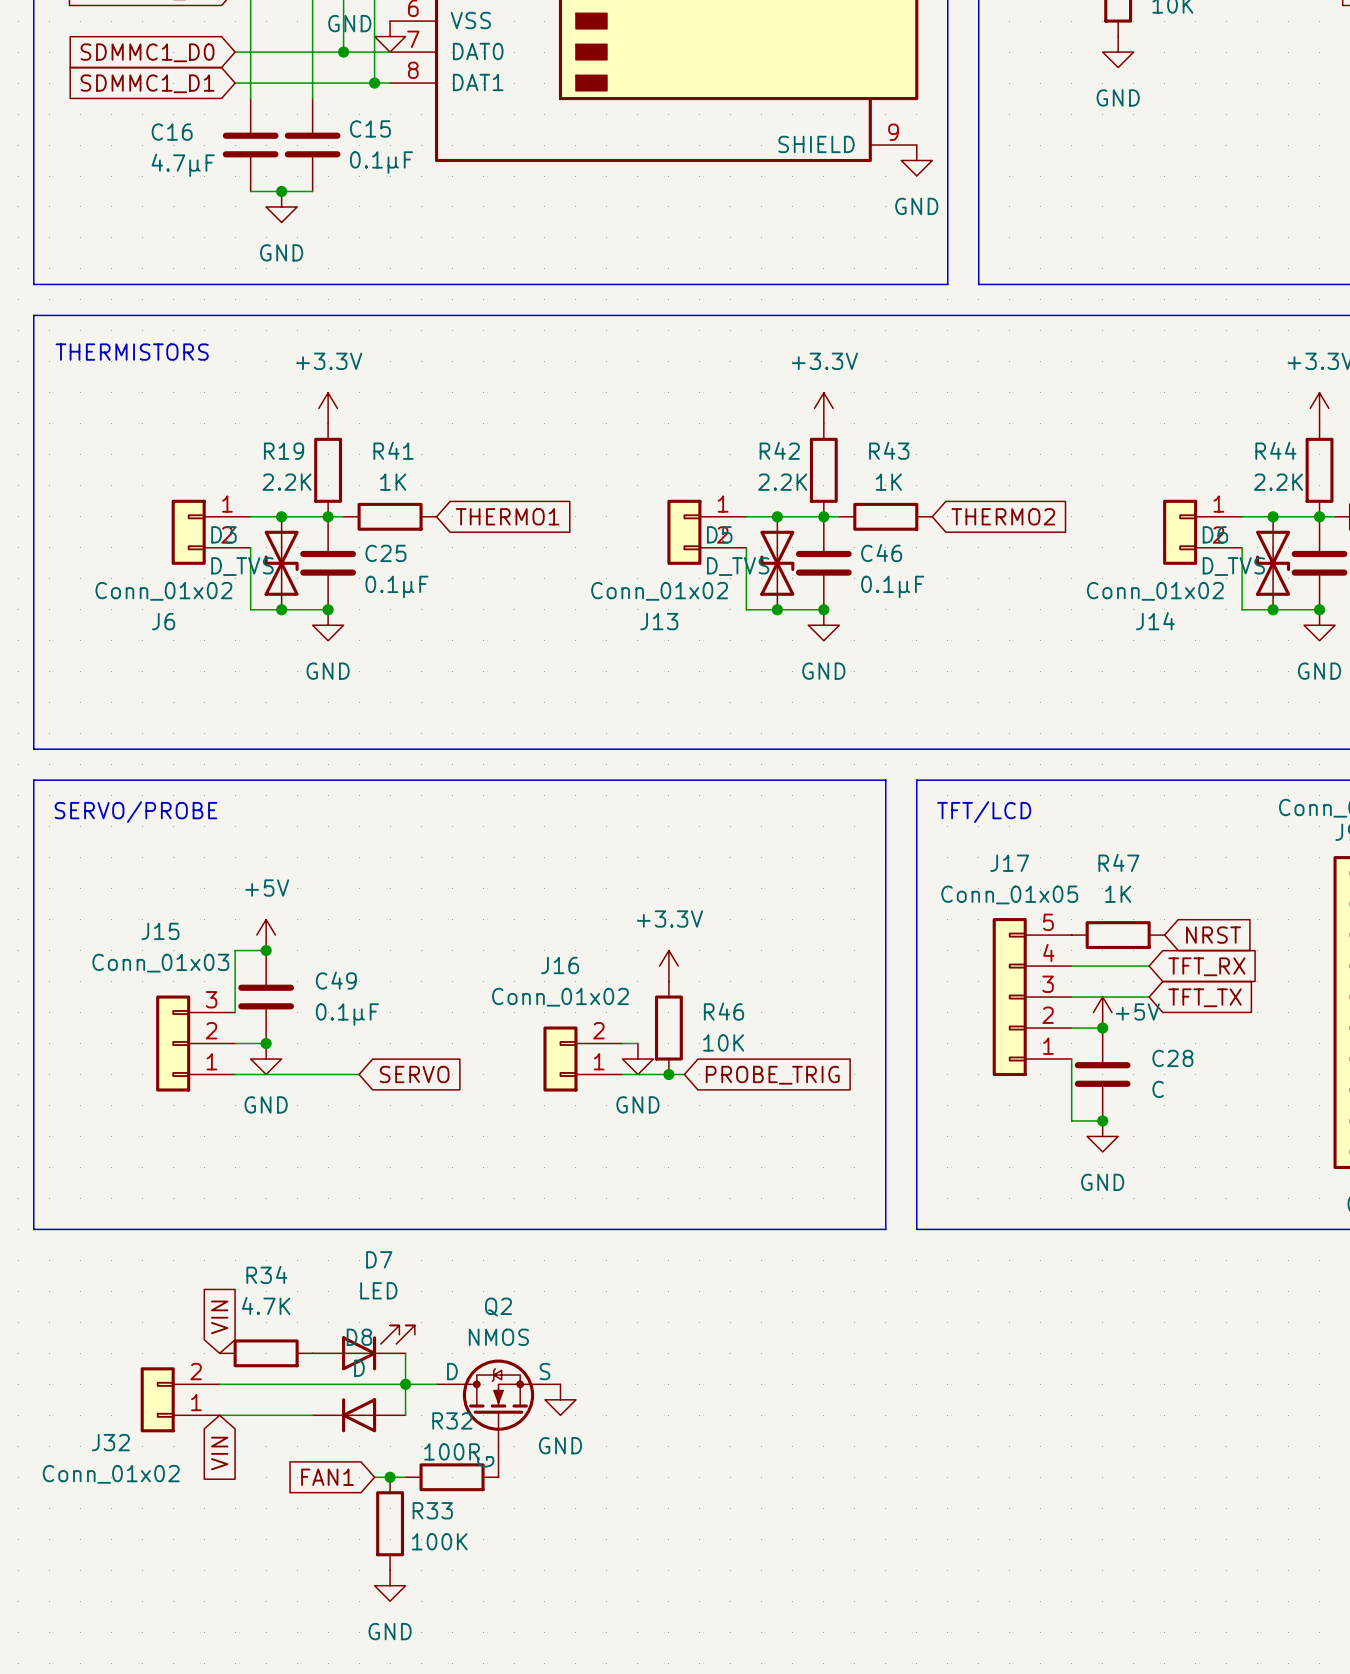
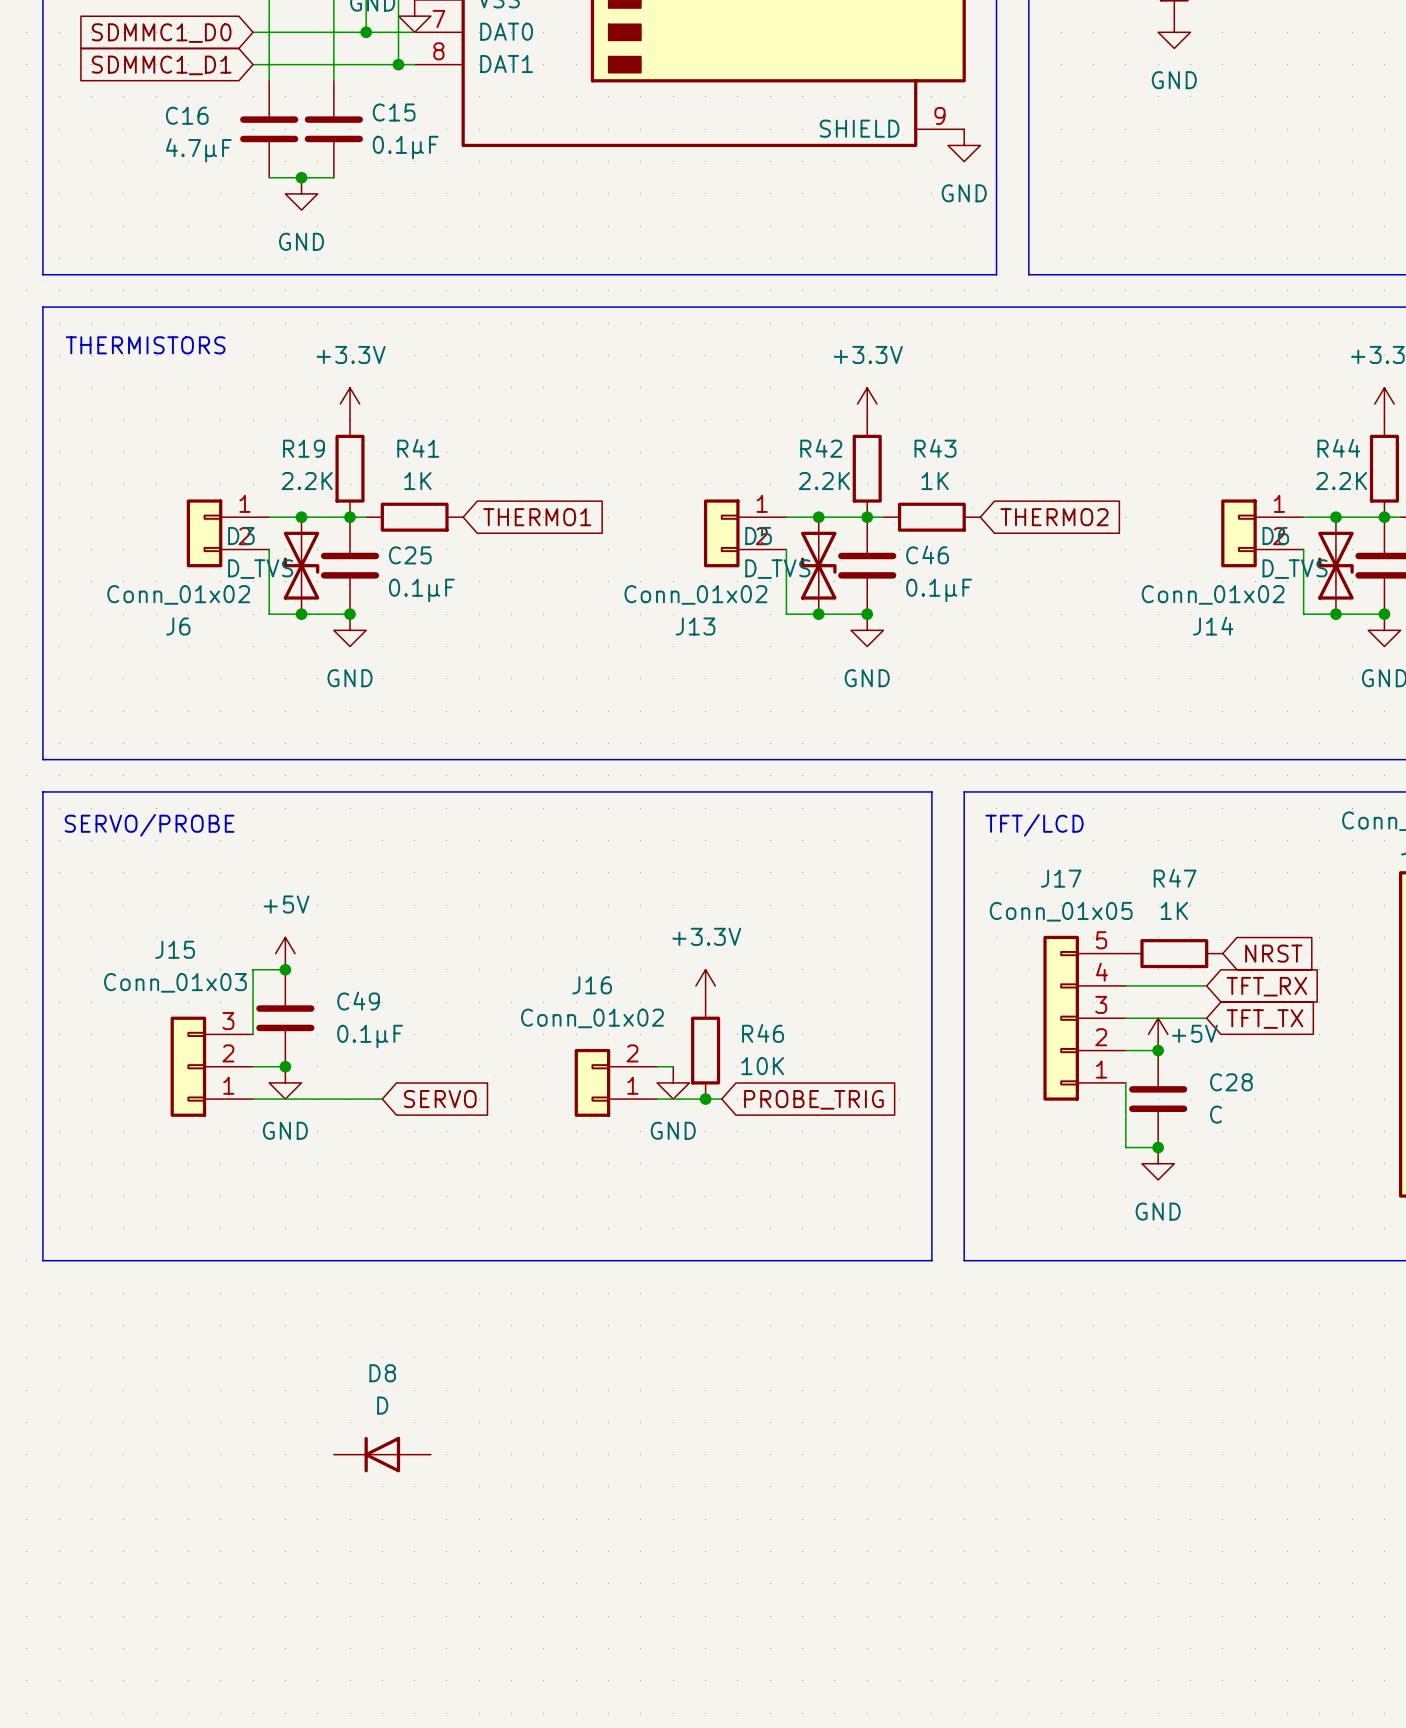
global label: VIN (219, 1317) -> none
D7: LED (363, 1347) -> none
R34: 4.7K (266, 1353) -> none
wire: (405, 1353) (405, 1415) -> none
wire: (219, 1384) (436, 1384) -> none
junction: (405, 1384) -> none
J32: Conn_01x02 (180, 1399) -> none
power symbol: GND (560, 1399) -> none
wire: (219, 1415) (312, 1415) -> none
Q2: NMOS (498, 1418) -> none
global label: VIN (219, 1453) -> none
global label: FAN1 (327, 1477) -> none
wire: (374, 1477) (405, 1477) -> none
junction: (390, 1477) -> none
R32: 100R (452, 1477) -> none
R33: 100K (390, 1523) -> none
power symbol: GND (390, 1585) -> none

